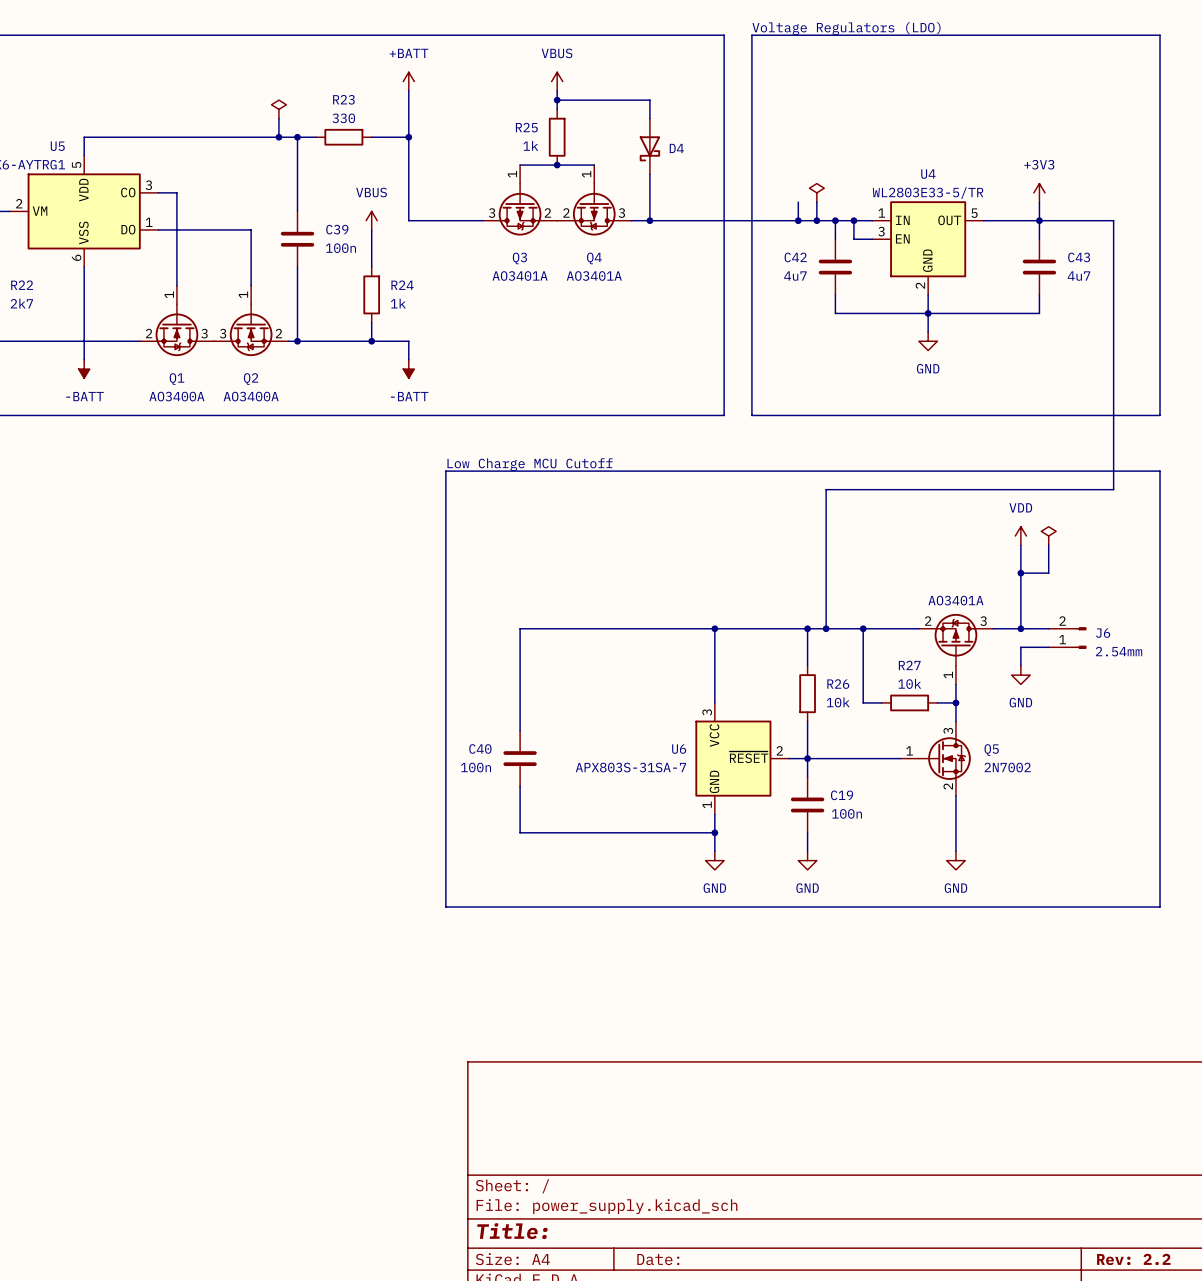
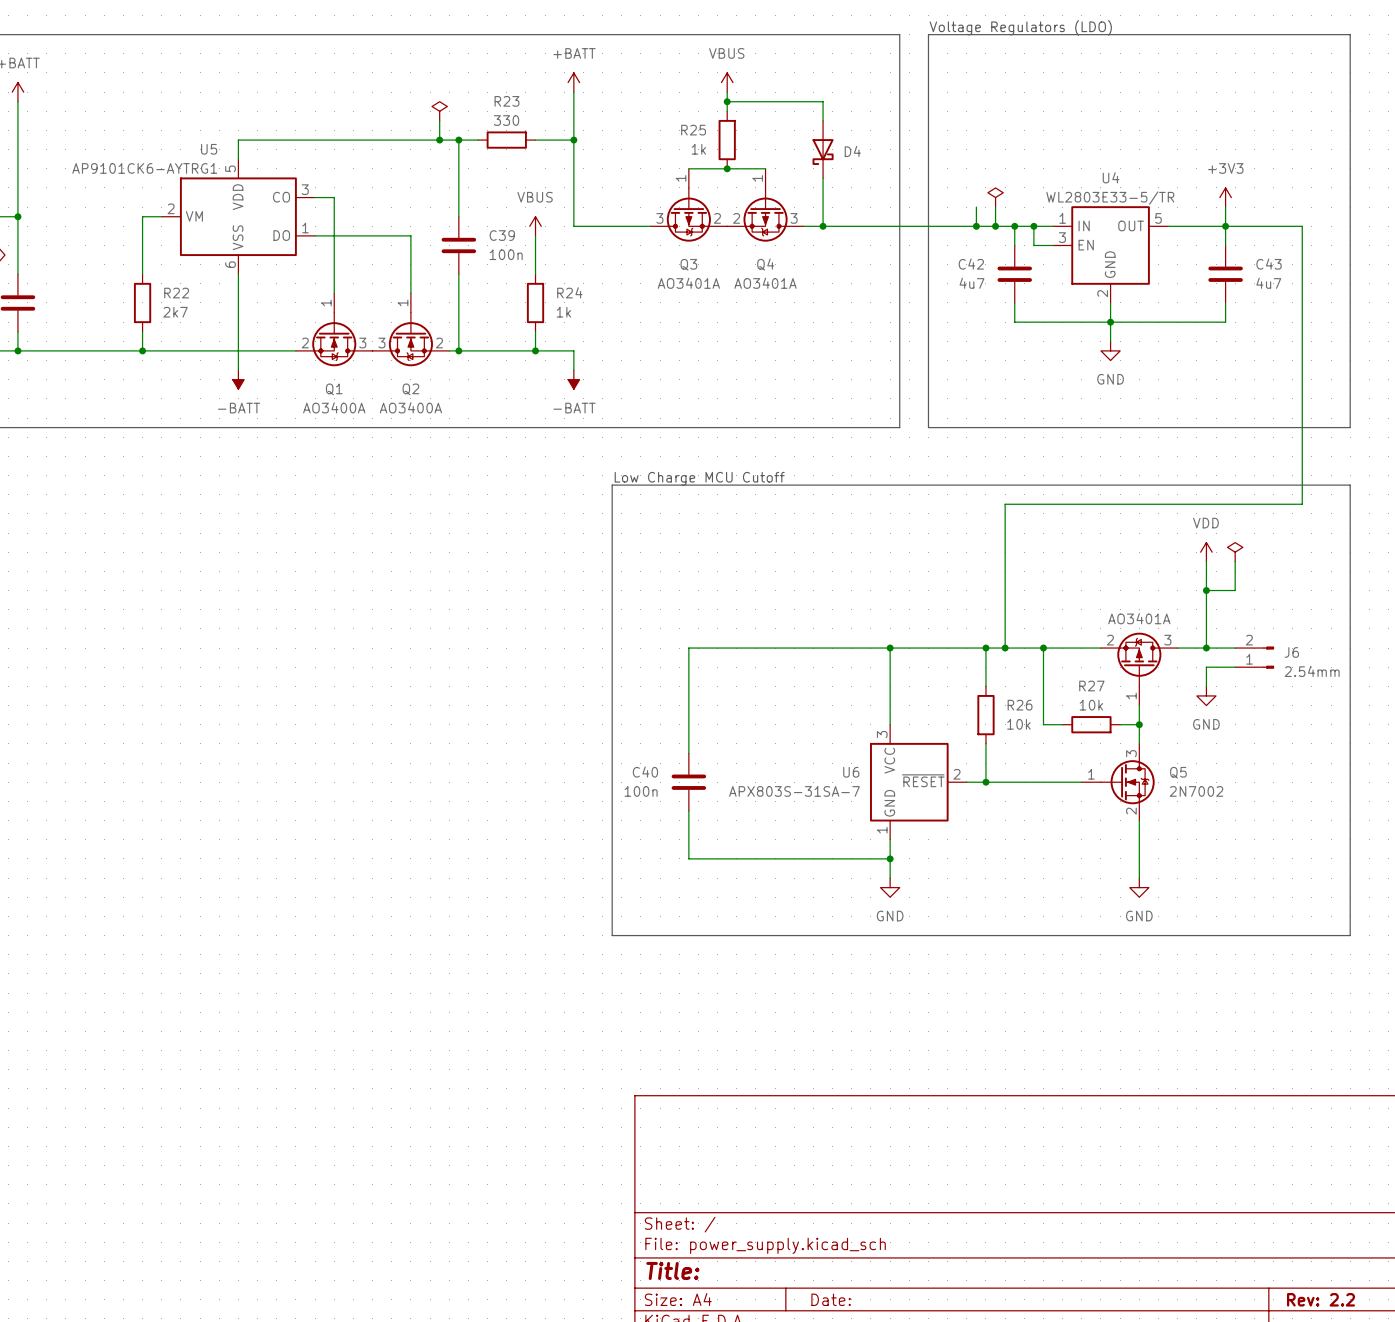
wire: (807, 758) (807, 777) -> none
C19: 100n (807, 804) -> none
wire: (807, 832) (807, 851) -> none
power symbol: GND (807, 860) -> none

